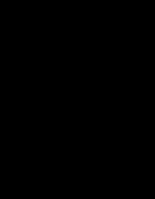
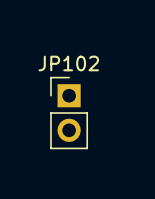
JP102: none -> (69, 113)

